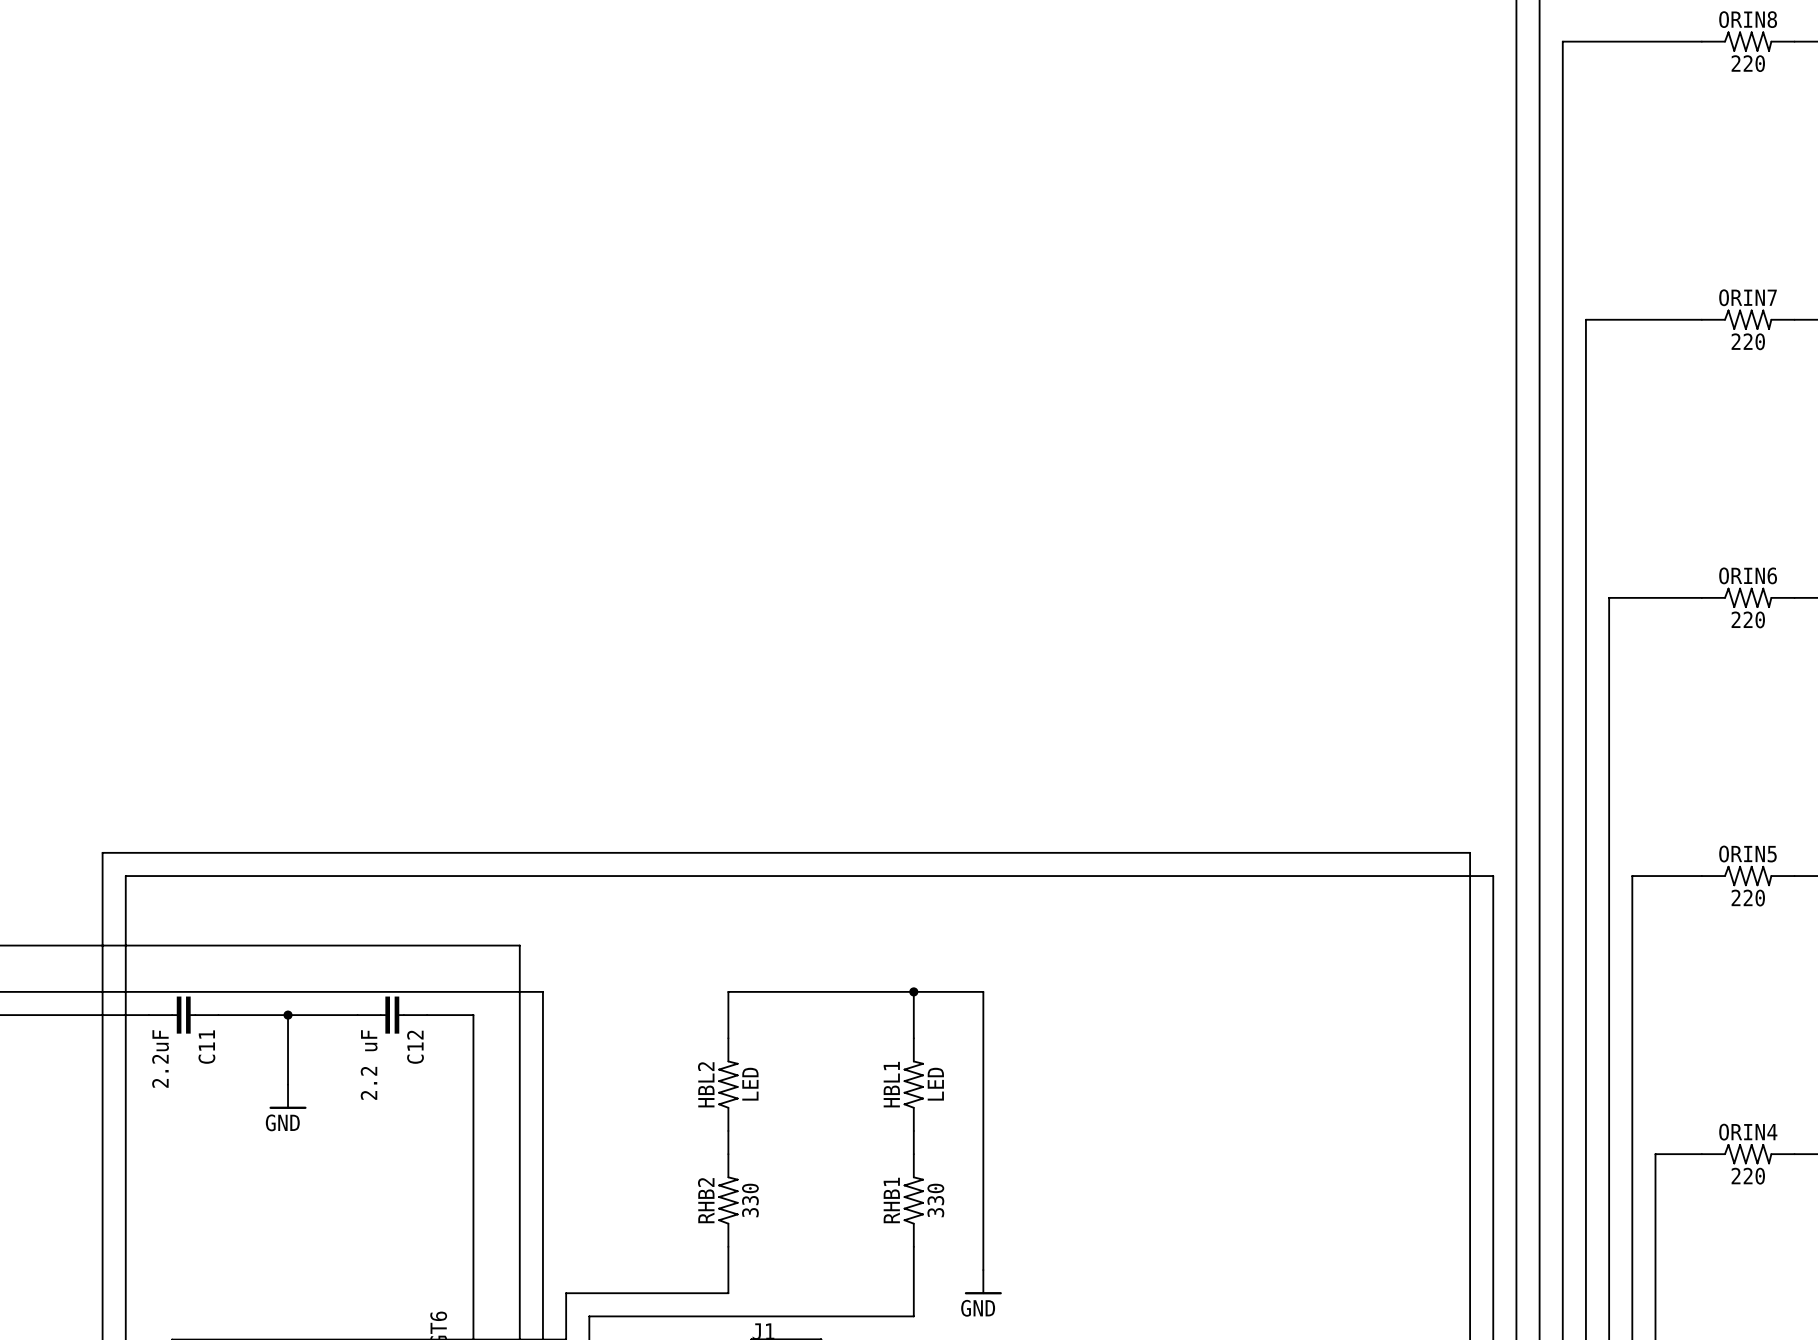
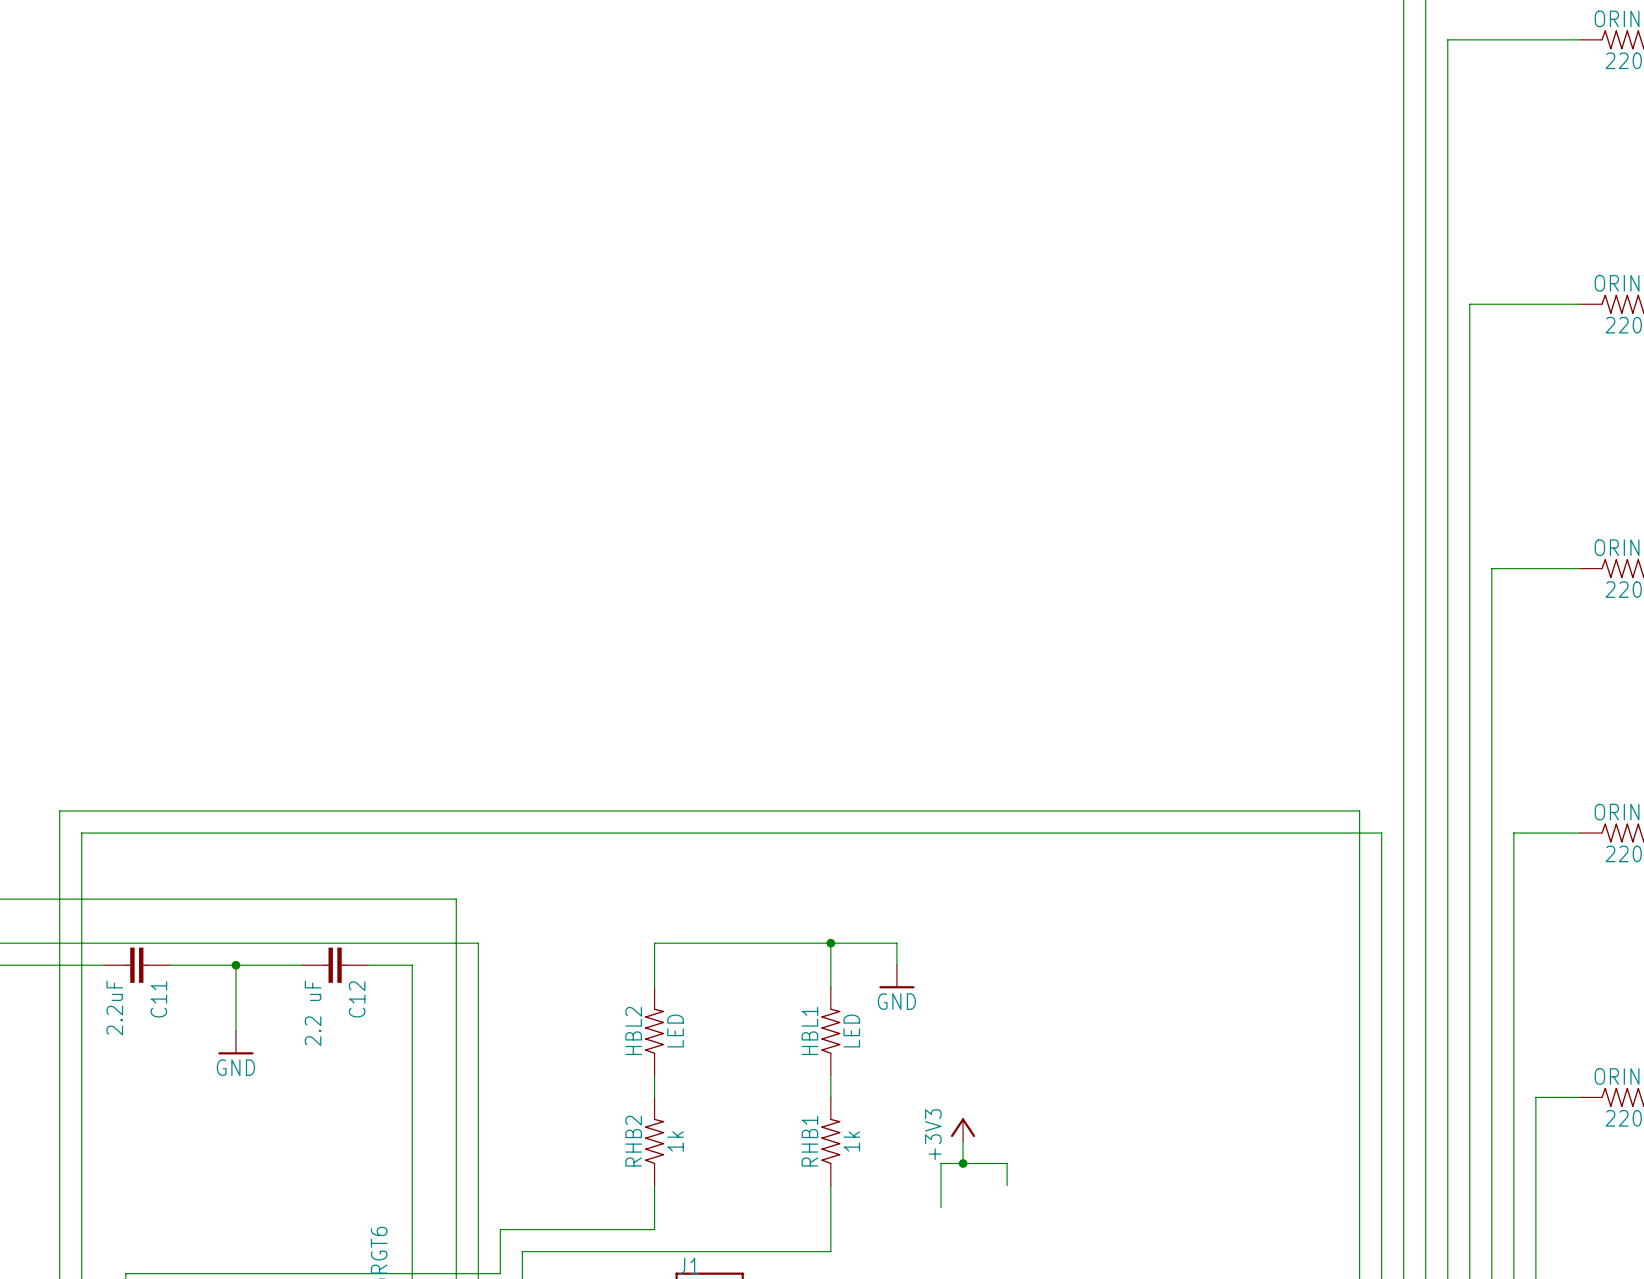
wire: (983, 1015) (983, 1270) -> none
power symbol: none -> GND (896, 976)
power symbol: none -> +3V3 (963, 1129)
RHB2 value: 330 (750, 1200) -> 1k (675, 1141)
RHB1 value: 330 (935, 1200) -> 1k (851, 1141)
wire: none -> (963, 1141) (963, 1163)
junction: none -> (963, 1163)
wire: none -> (1007, 1185) (1007, 1163) (941, 1163) (941, 1207)
power symbol: GND (983, 1282) -> none

